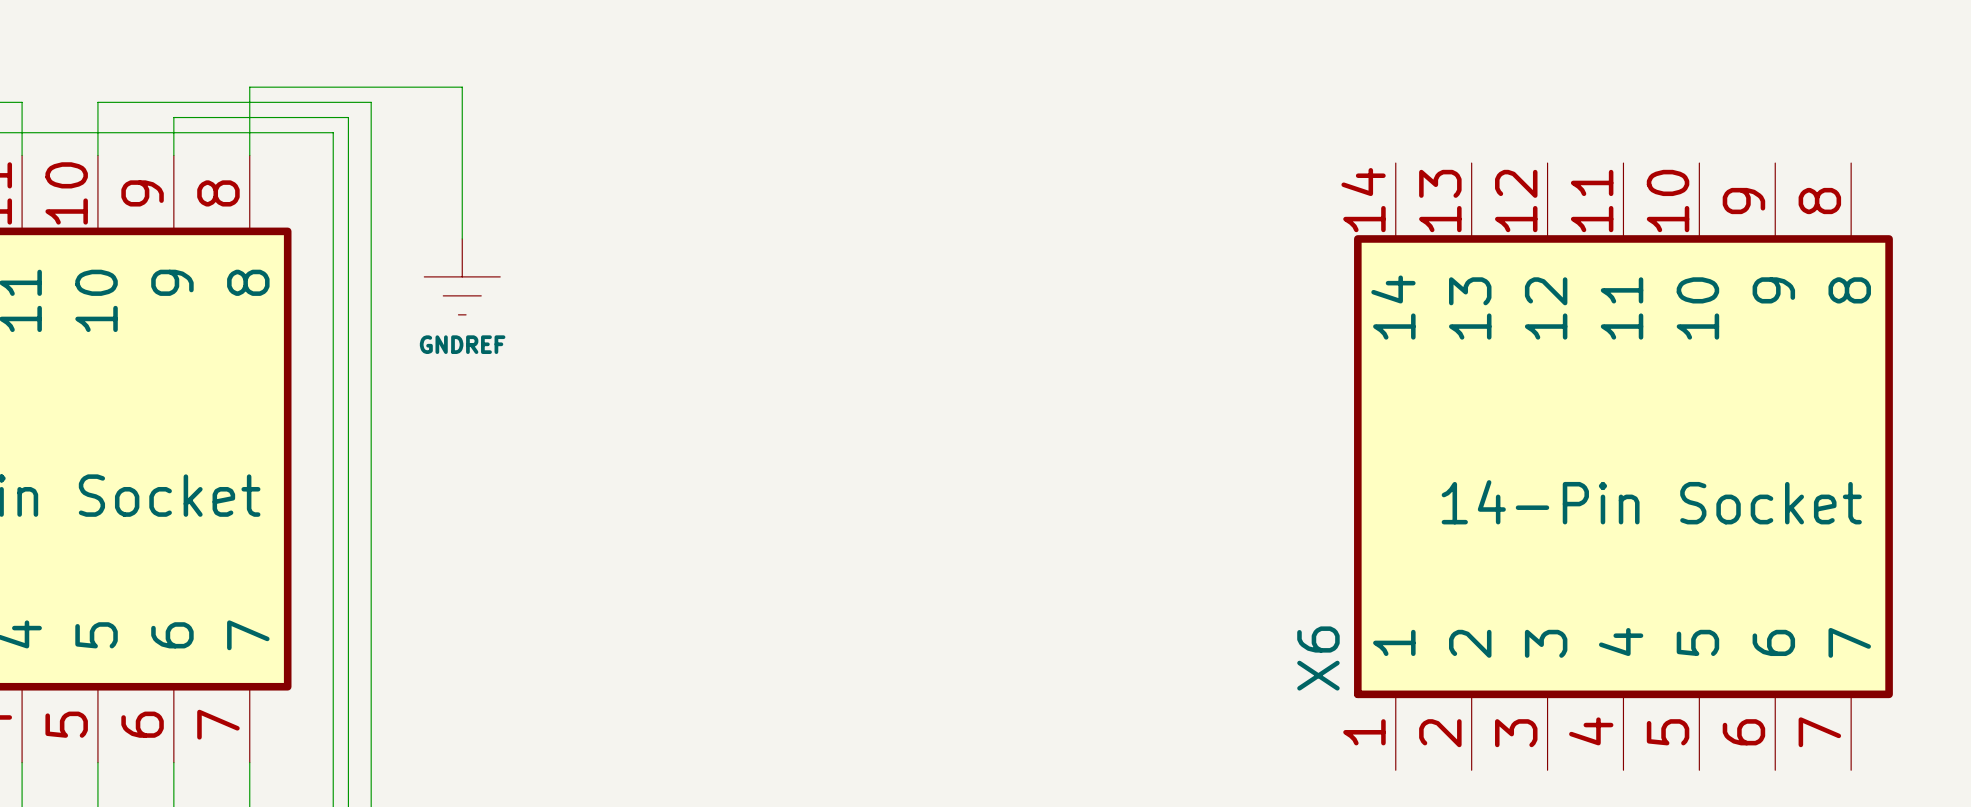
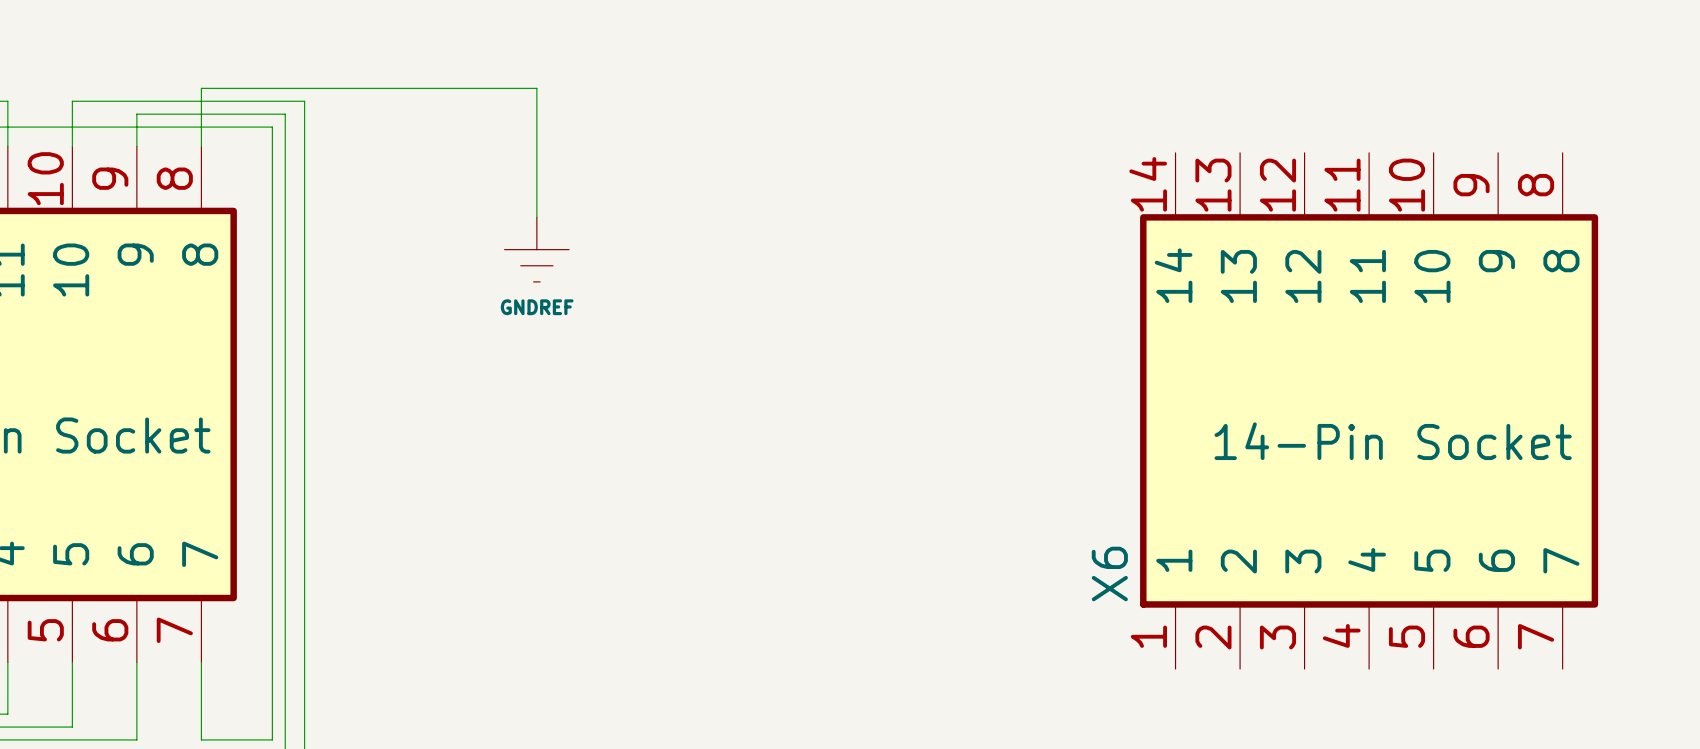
wire: (462, 87) (462, 238) -> (382, 88) (536, 88) (536, 217)
power symbol position: GNDREF (462, 276) -> GNDREF (536, 249)

